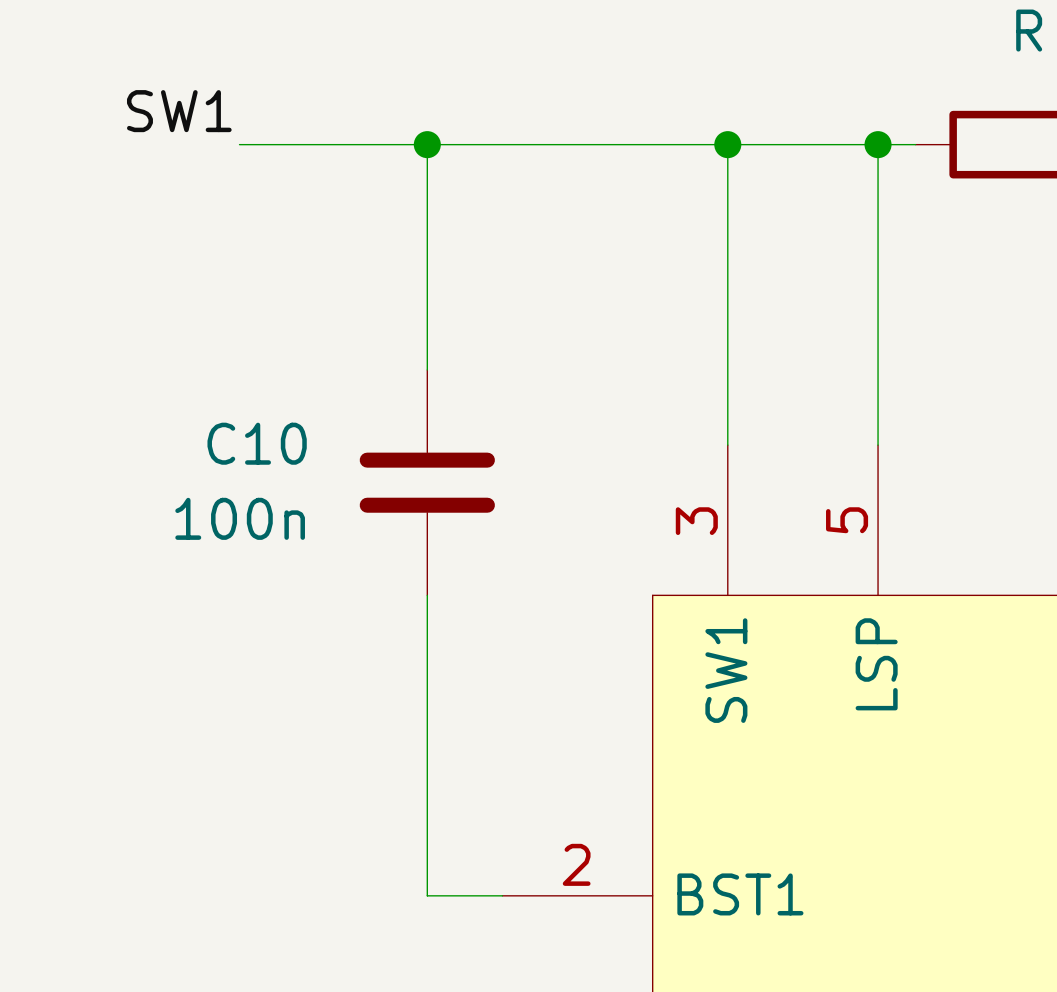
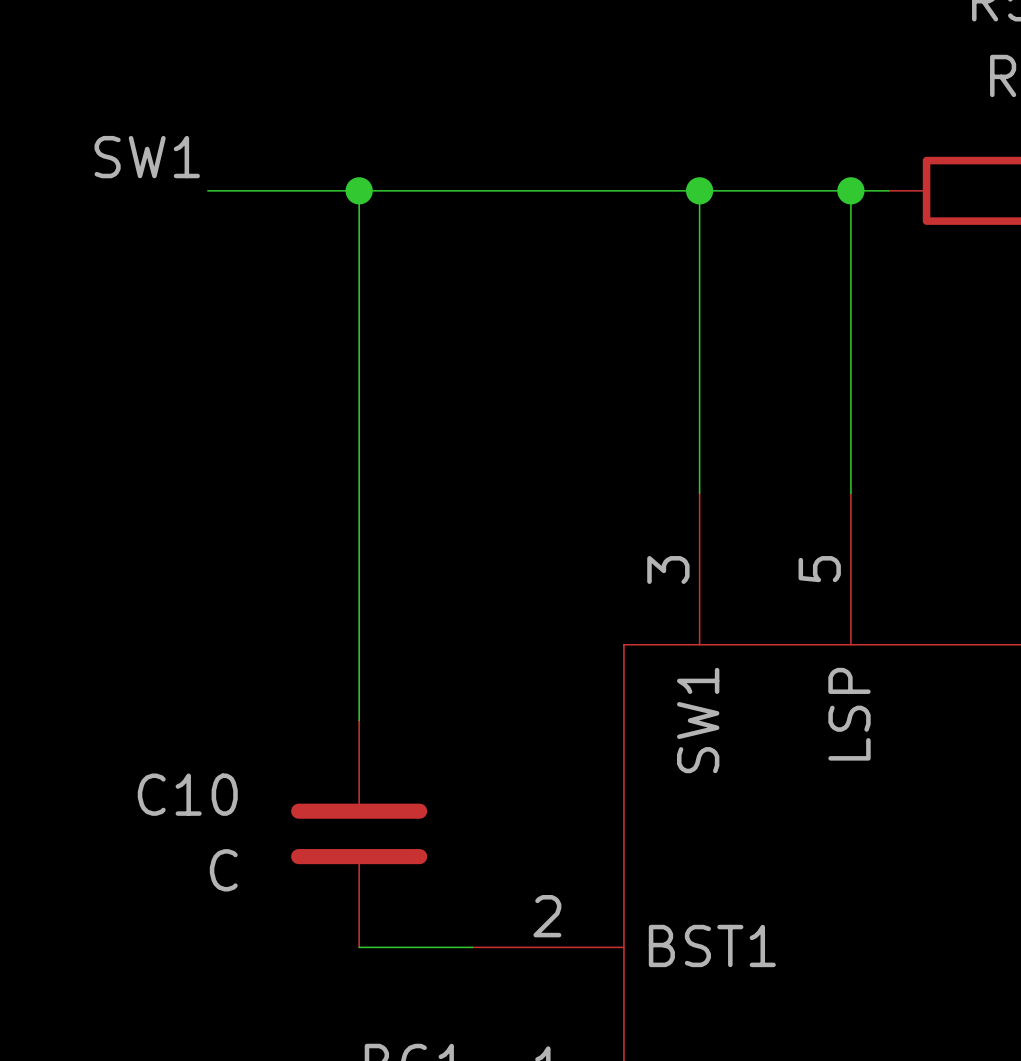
wire: none -> (359, 190) (359, 720)
wire: (427, 144) (427, 370) -> none
junction position: (427, 144) -> (359, 190)
C10 position: (427, 482) -> (359, 833)
C10 value: 100n (240, 518) -> C (223, 870)
wire: (427, 595) (427, 895) -> (359, 947) (396, 947)

